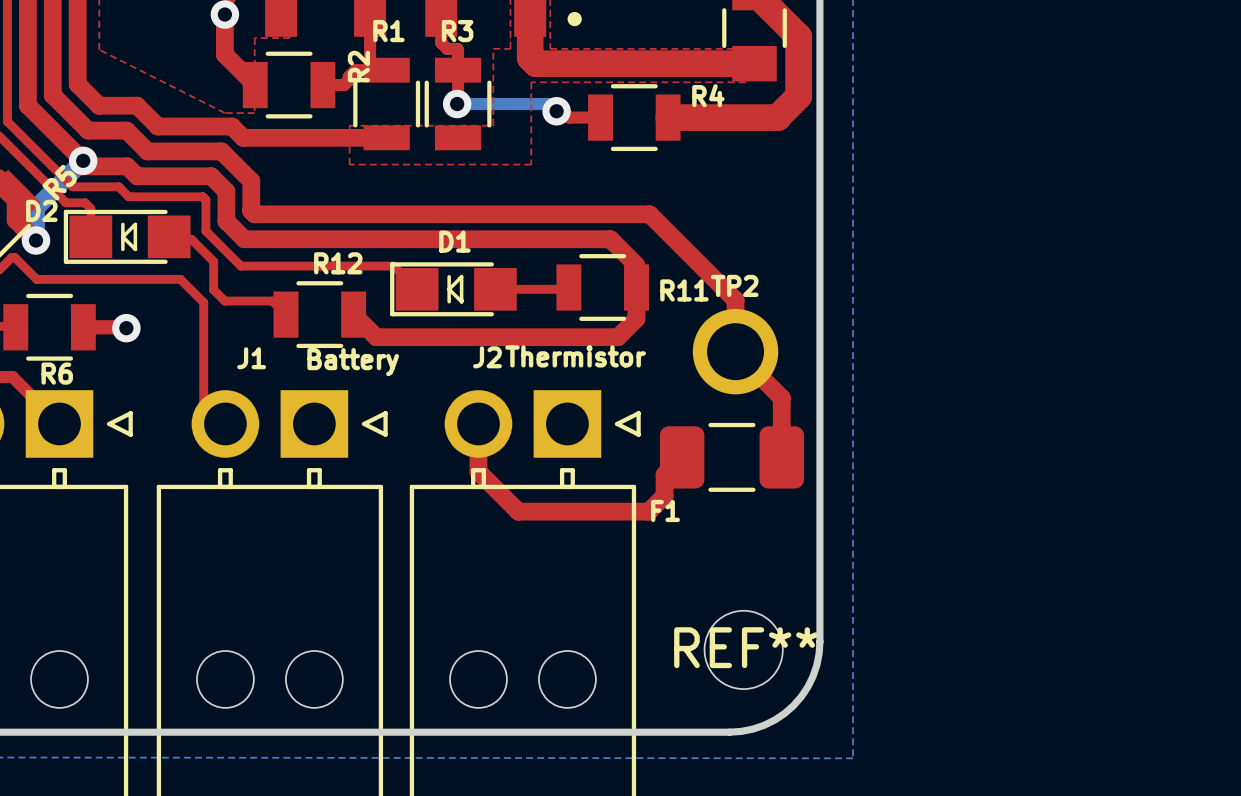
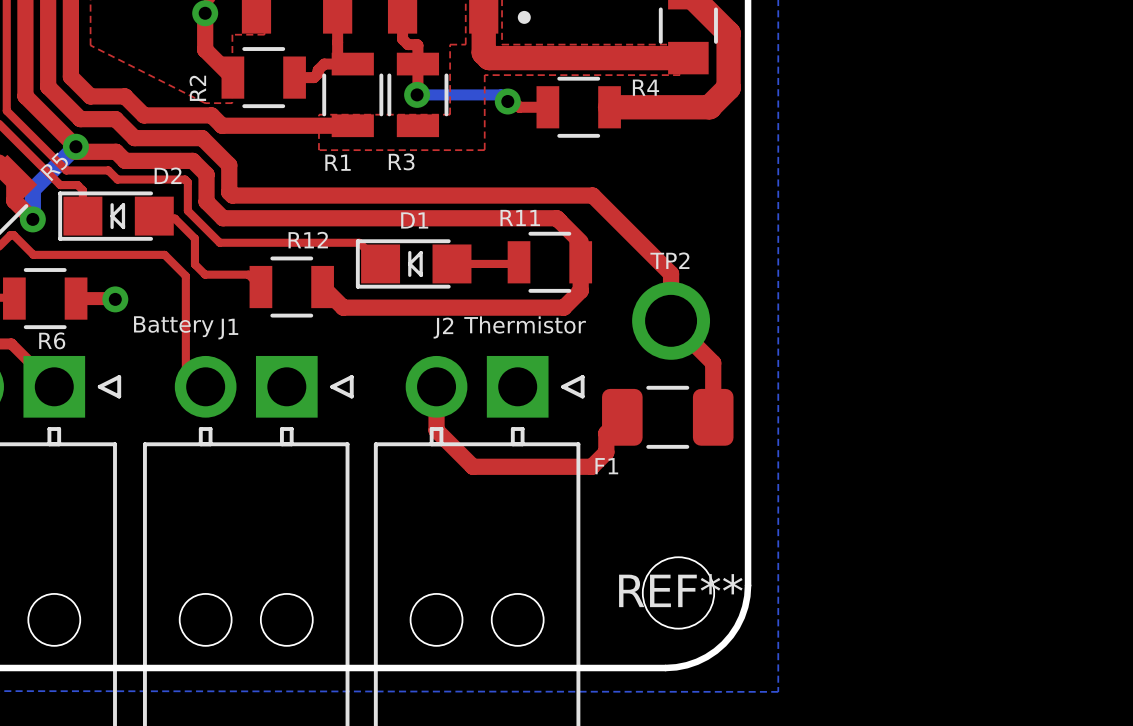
R1 name position: R1 (388, 31) -> R1 (338, 162)
R3 name position: R3 (457, 31) -> R3 (401, 161)
R2 name position: R2 (358, 66) -> R2 (197, 88)
D2 name position: D2 (41, 210) -> D2 (168, 175)
R11 name position: R11 (684, 290) -> R11 (520, 217)
text position: Battery (353, 362) -> Battery (173, 326)

